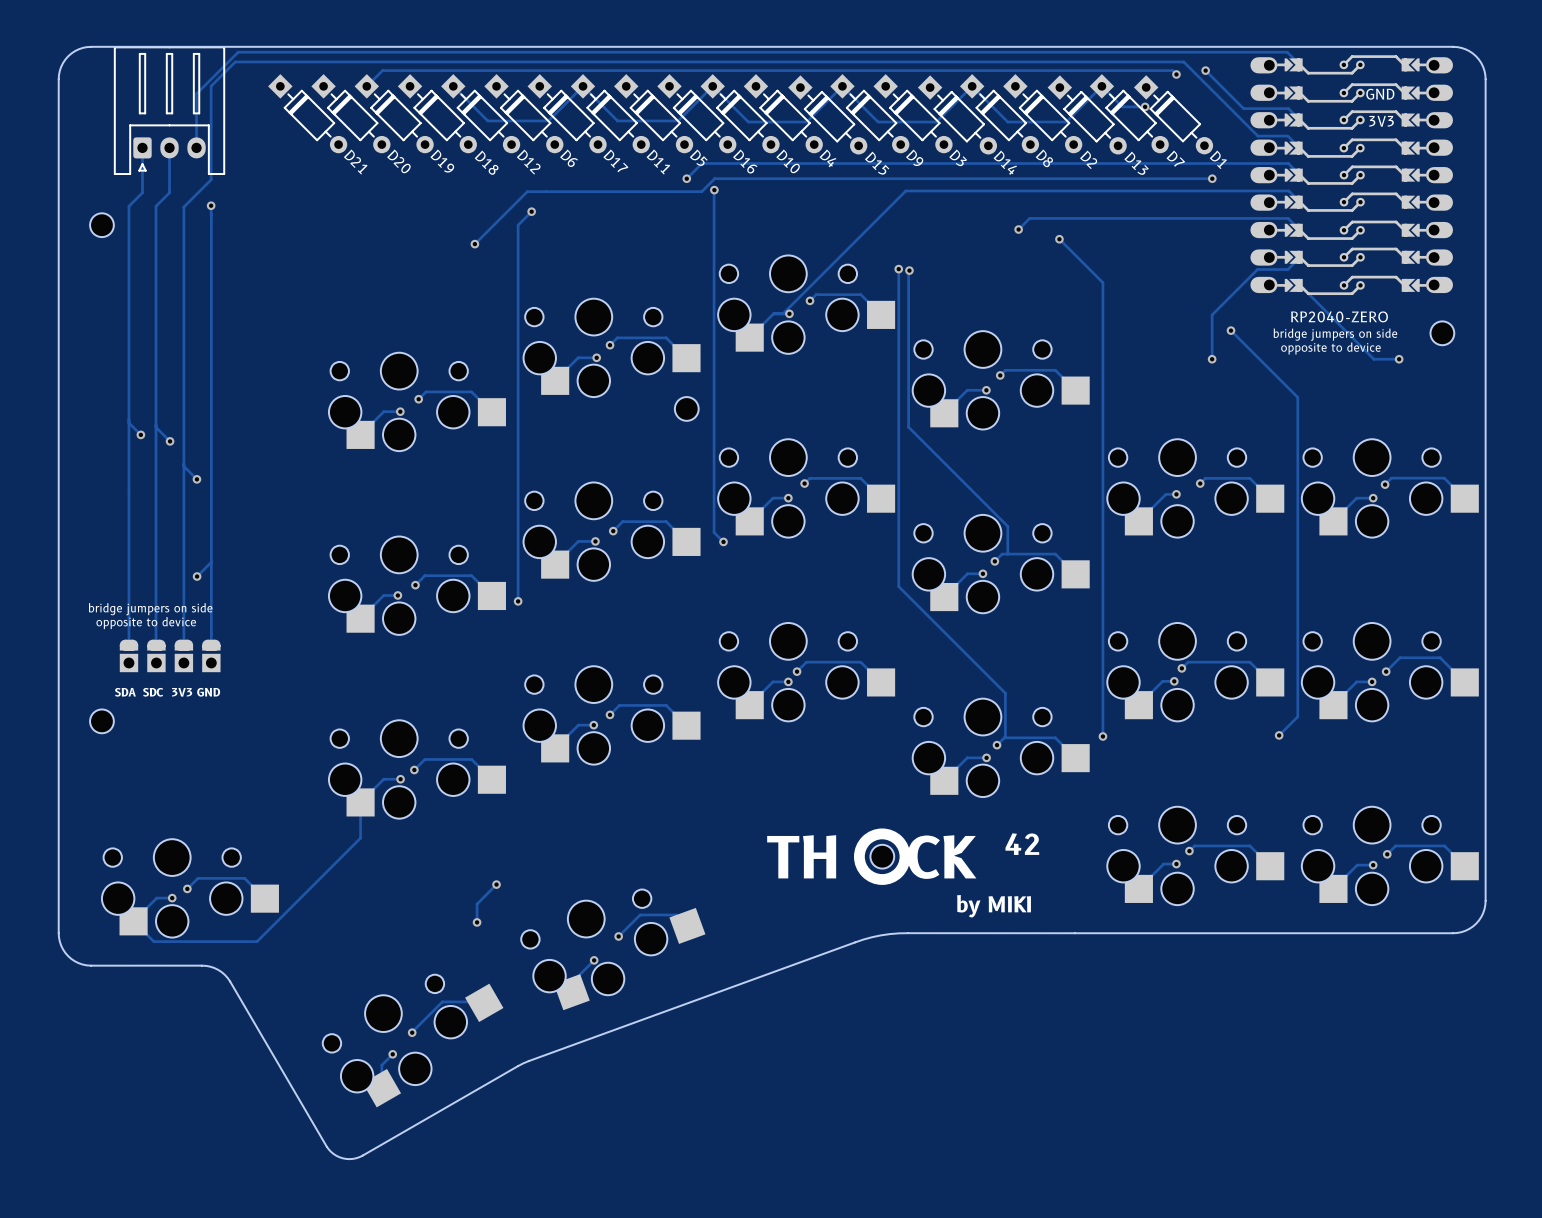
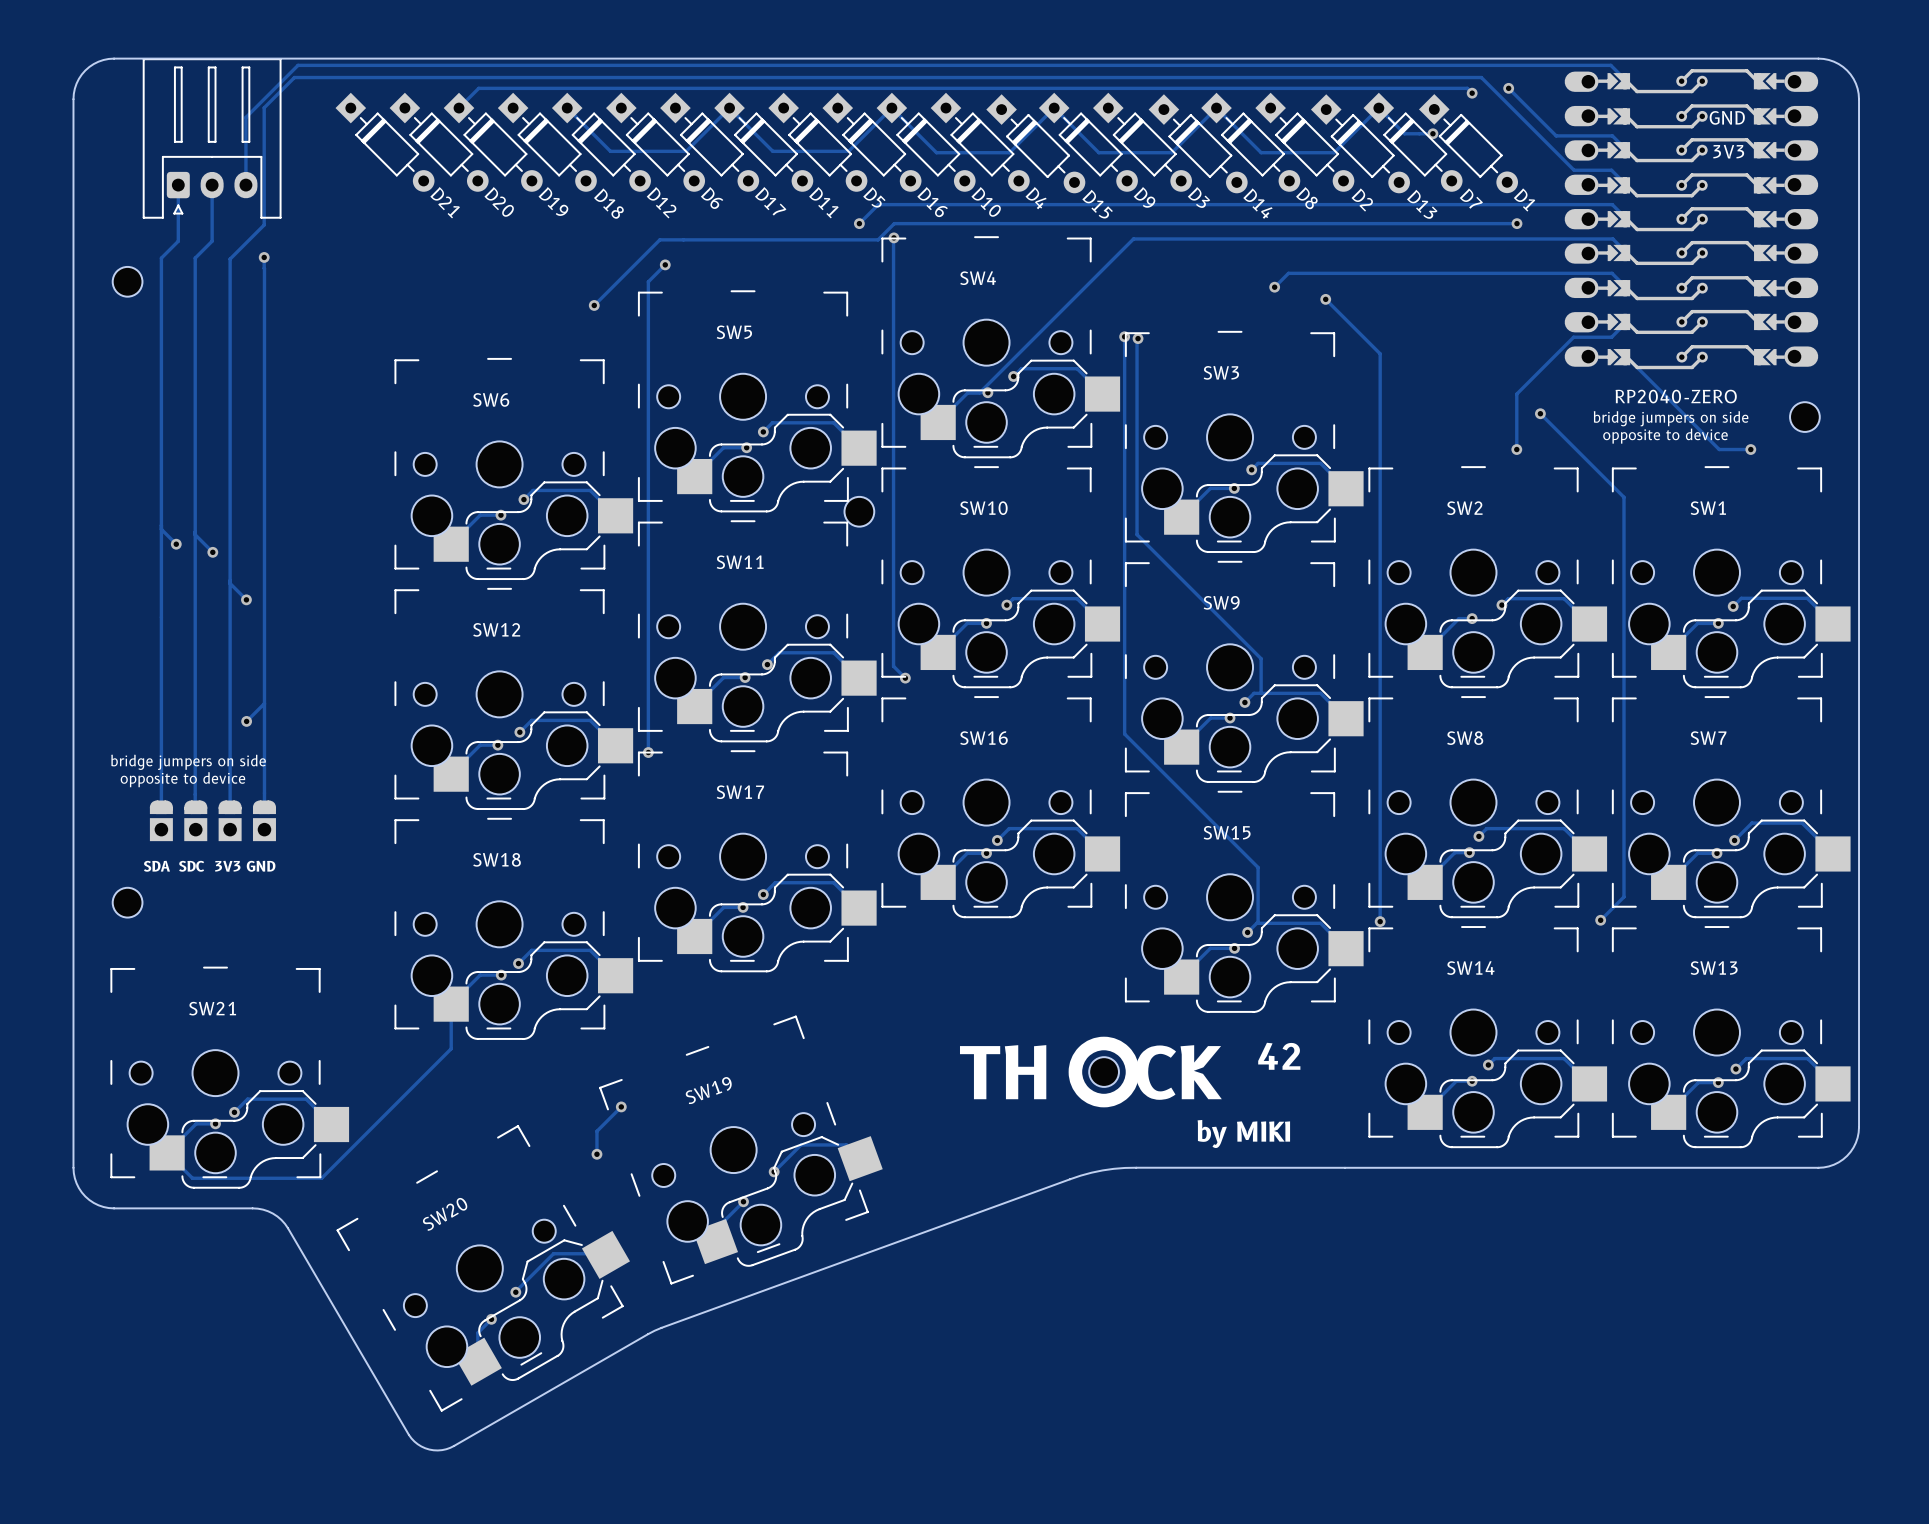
SW4: none -> (1000, 347)
part: (806, 304) -> none
SW5: none -> (757, 401)
part: (612, 347) -> none
SW3: none -> (1244, 441)
SW6: none -> (513, 469)
part: (1001, 380) -> none
part: (417, 401) -> none
SW10: none -> (1000, 577)
SW2: none -> (1487, 577)
SW1: none -> (1731, 577)
part: (806, 488) -> none
part: (1195, 488) -> none
part: (1390, 488) -> none
SW11: none -> (757, 631)
part: (612, 531) -> none
SW9: none -> (1244, 671)
SW12: none -> (513, 698)
part: (1001, 564) -> none
part: (417, 585) -> none
SW16: none -> (1000, 807)
SW8: none -> (1487, 807)
SW7: none -> (1731, 807)
part: (806, 672) -> none
part: (1195, 672) -> none
part: (1390, 672) -> none
SW17: none -> (757, 861)
part: (612, 715) -> none
SW15: none -> (1244, 901)
SW18: none -> (513, 928)
part: (1001, 747) -> none
part: (417, 769) -> none
SW14: none -> (1487, 1037)
SW13: none -> (1731, 1037)
part: (1195, 855) -> none
part: (1390, 855) -> none
SW21: none -> (229, 1077)
part: (190, 888) -> none
SW19: none -> (741, 1150)
part: (613, 949) -> none
SW20: none -> (483, 1268)
part: (413, 1041) -> none

